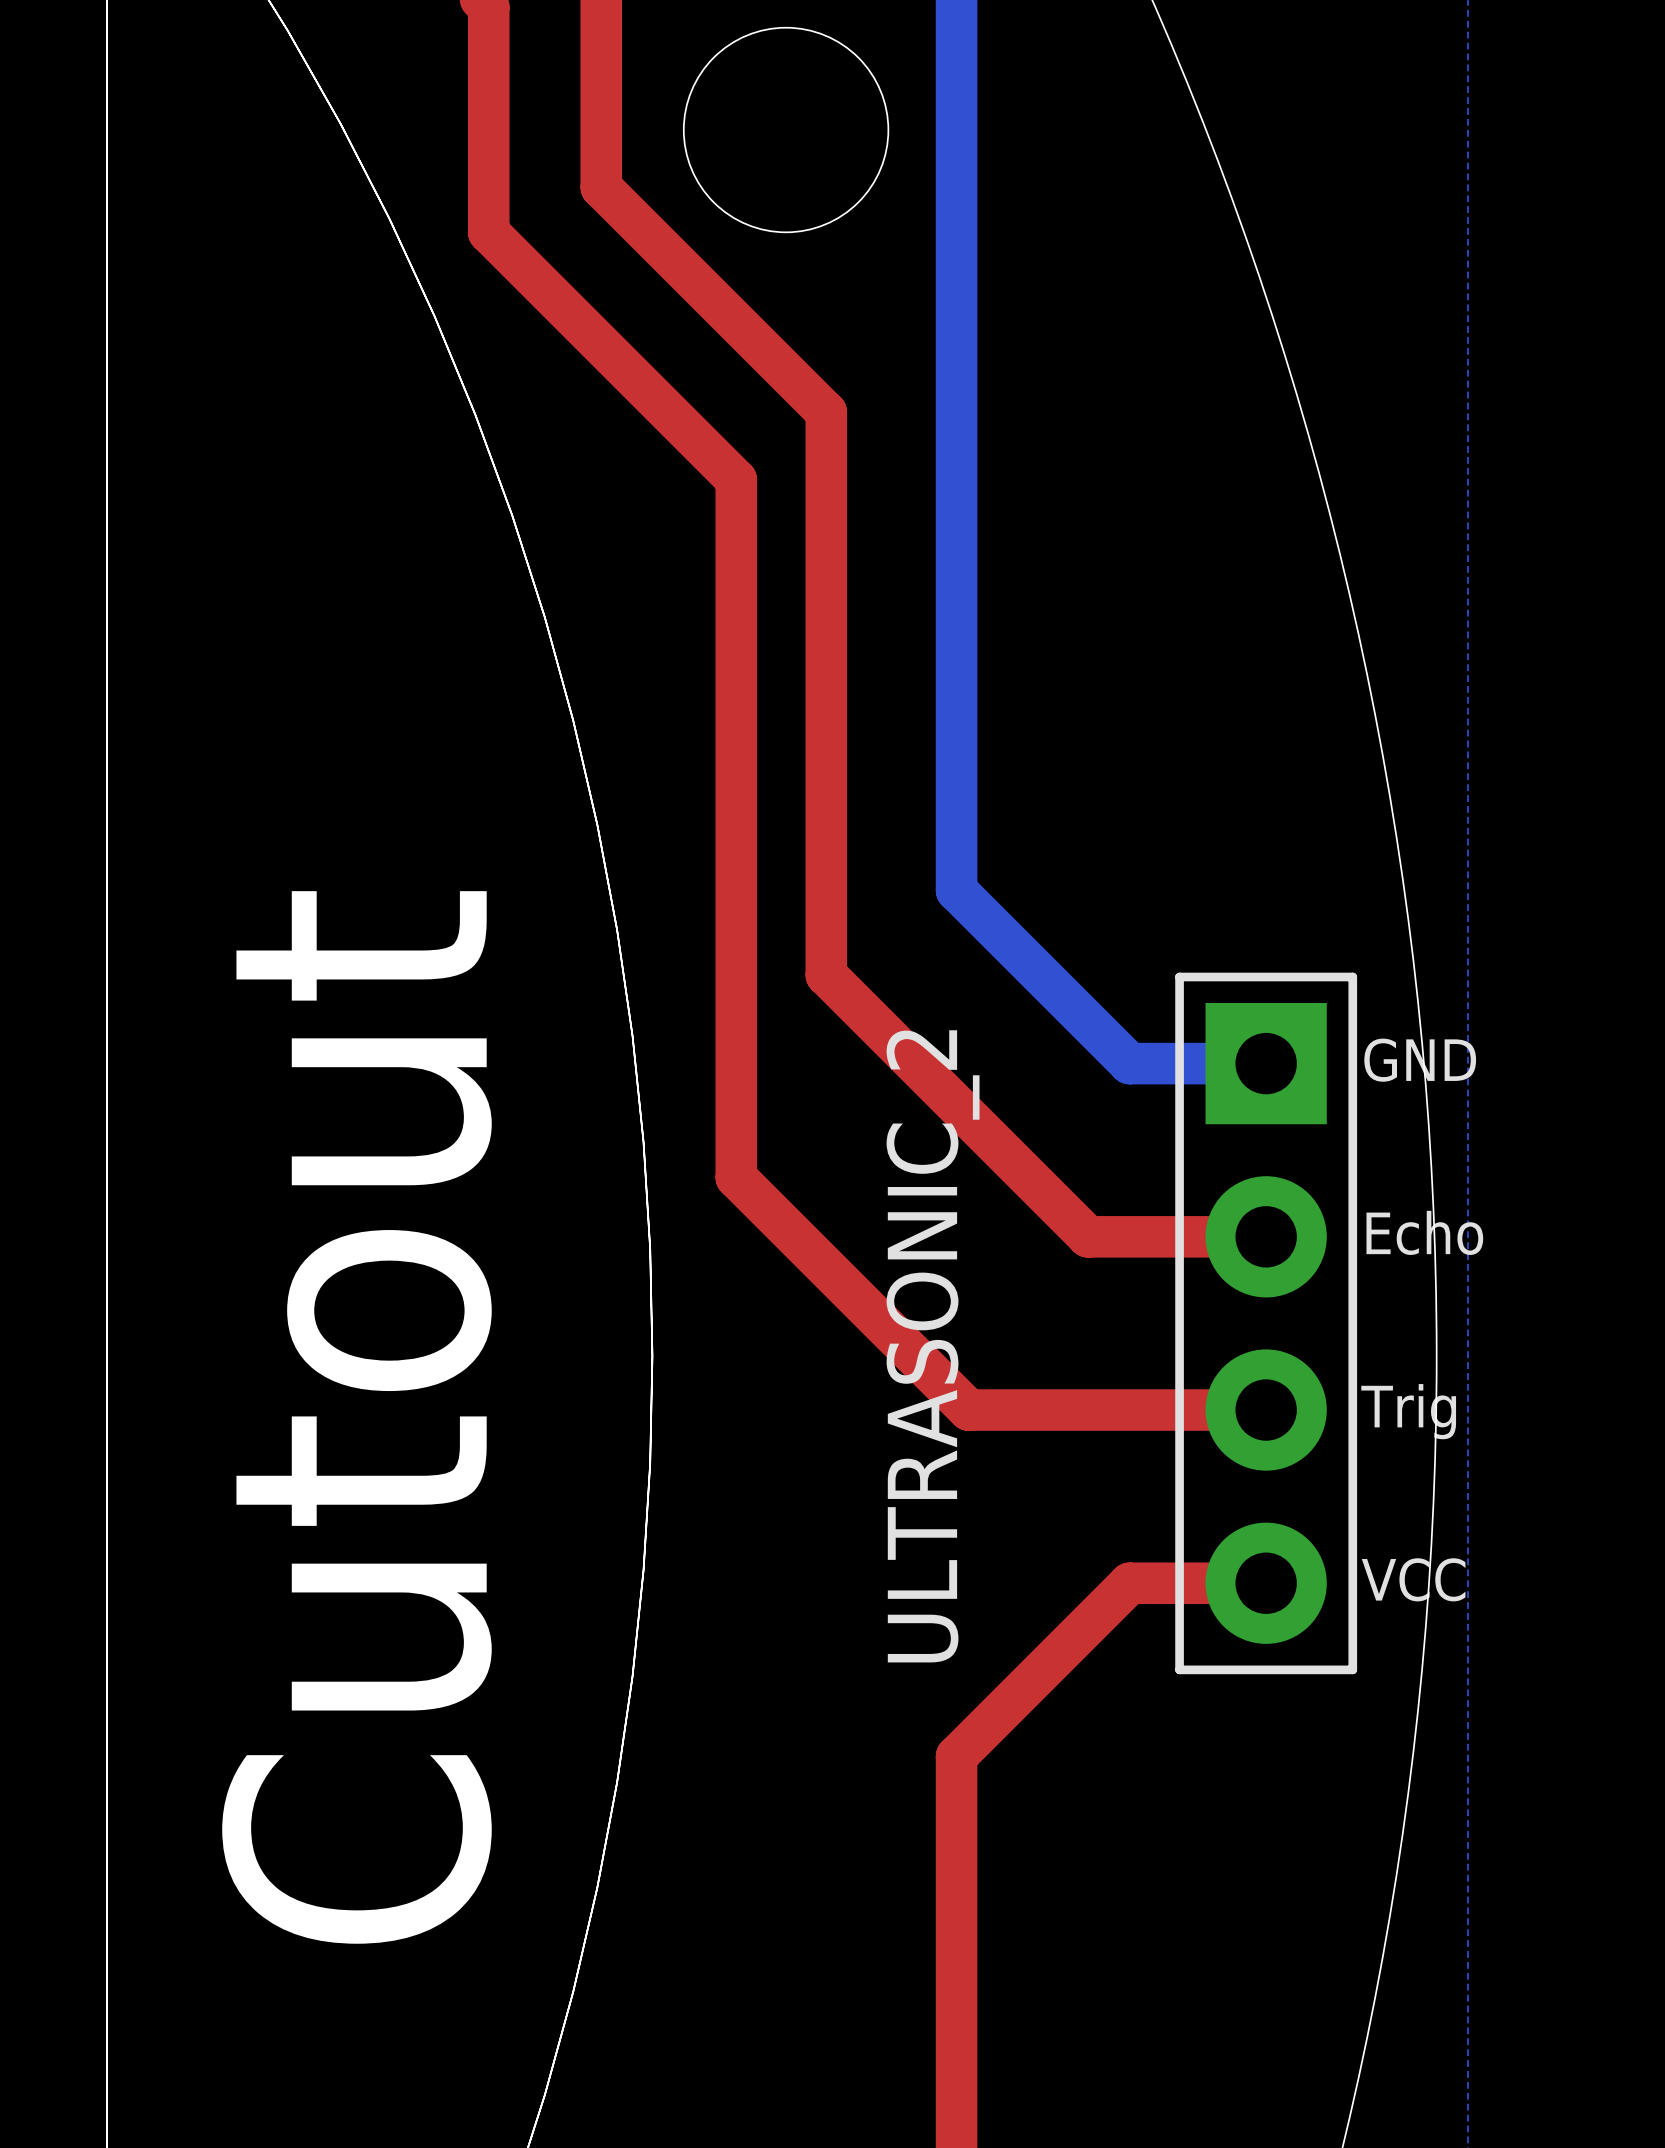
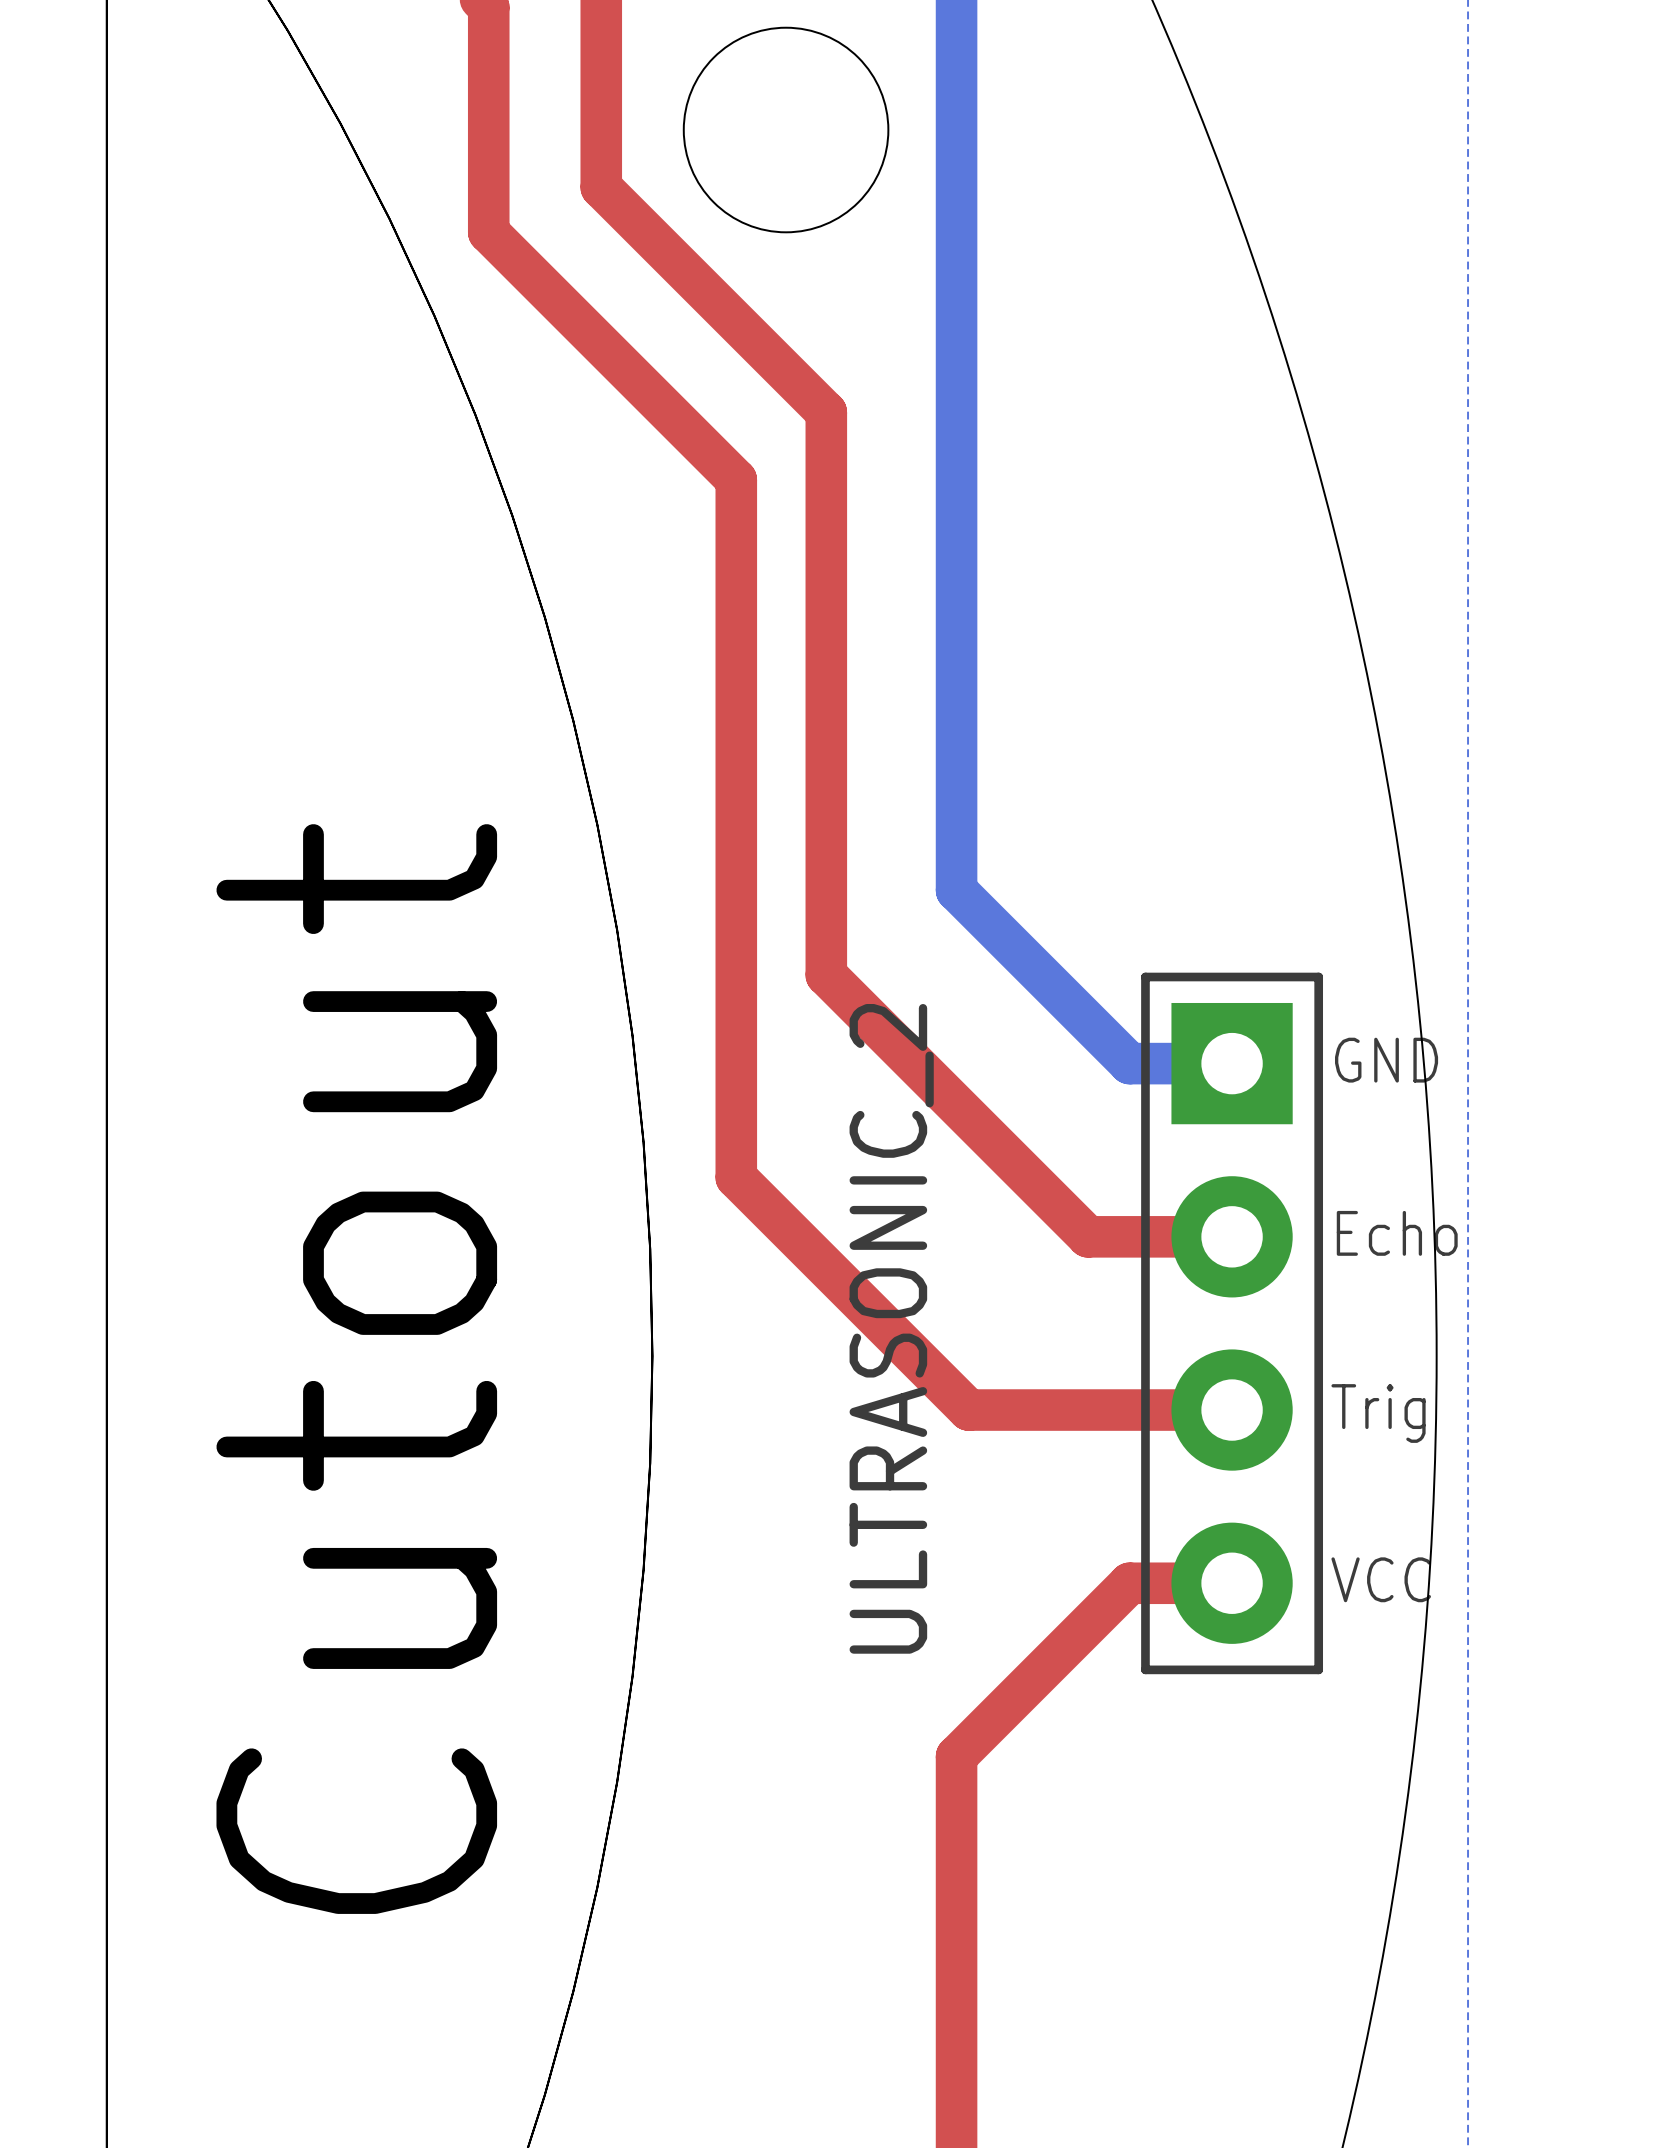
ULTRASONIC_2 position: (1266, 1323) -> (1232, 1323)

